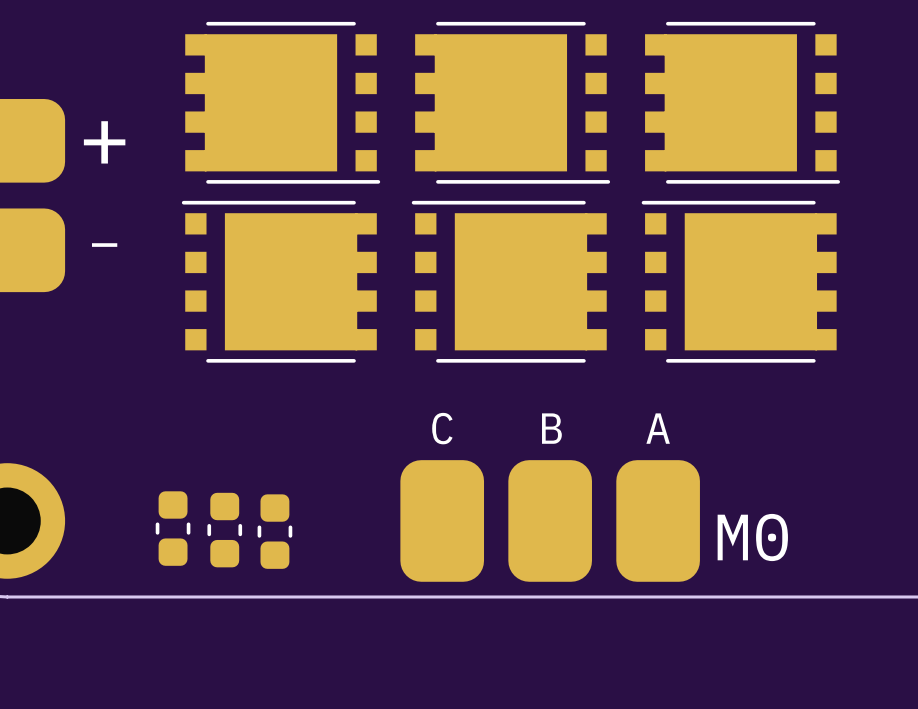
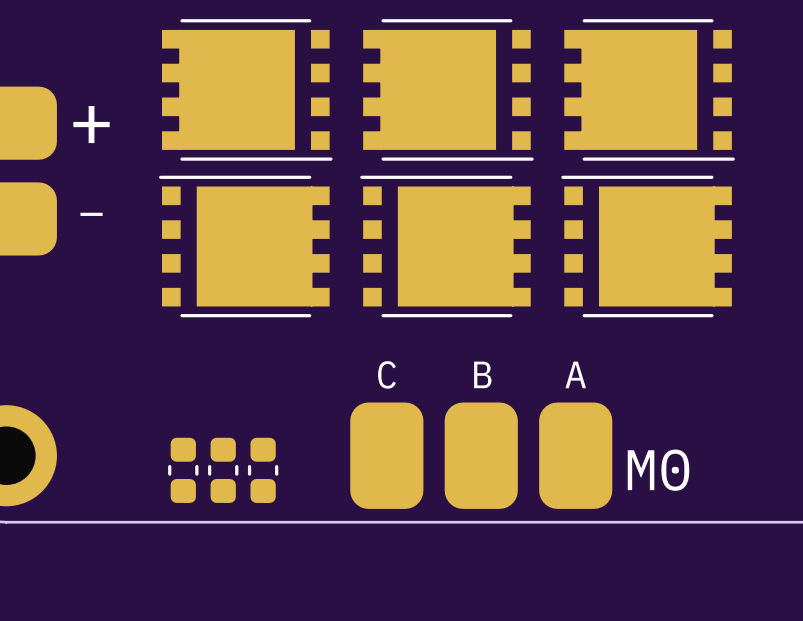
part: (173, 528) -> none
part: (224, 530) -> none
part: (274, 531) -> none
part: none -> (183, 470)
part: none -> (223, 470)
part: none -> (263, 470)

